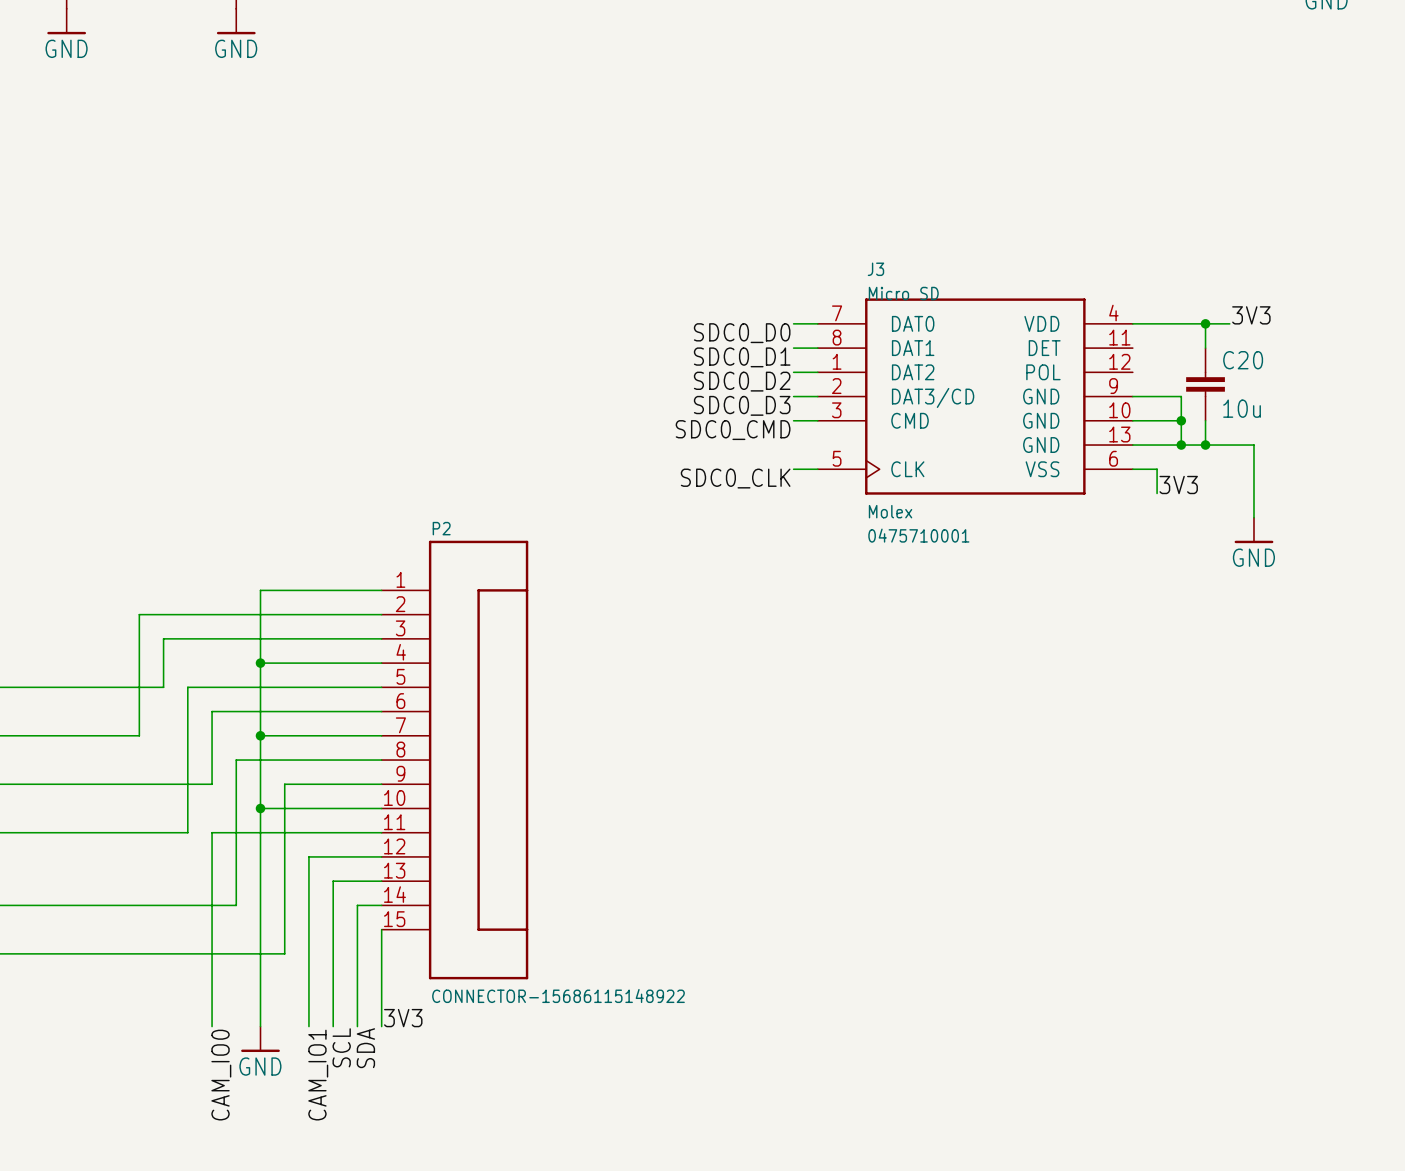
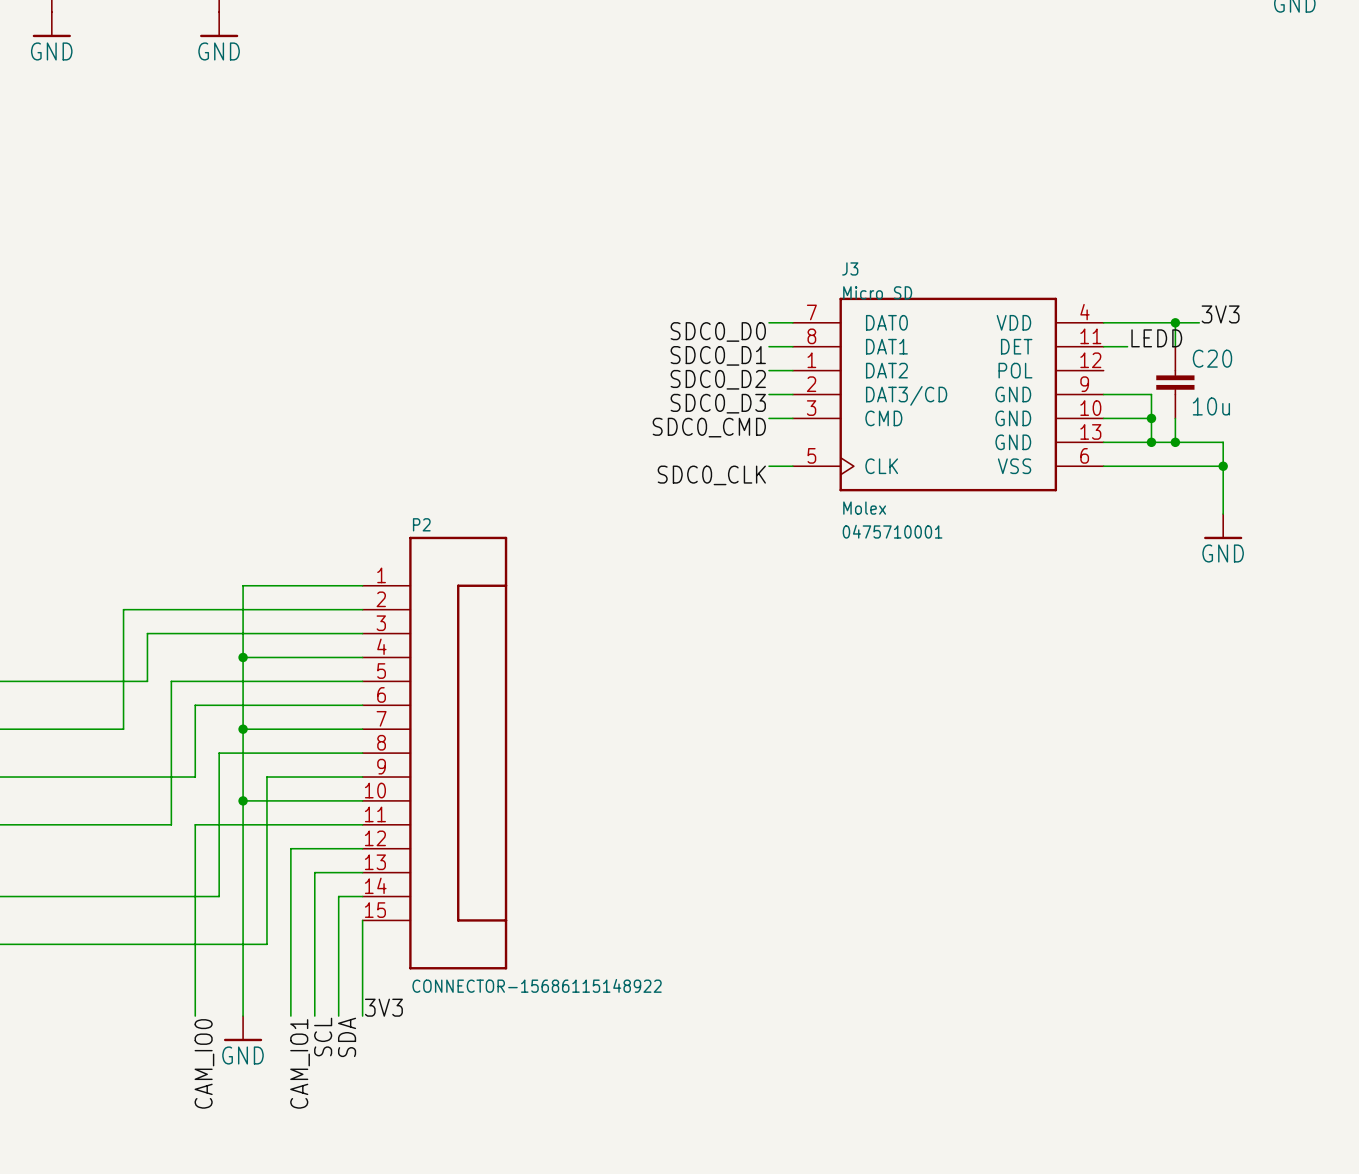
label: none -> LEDD (1156, 338)
wire: none -> (1103, 346) (1127, 346)
wire: (1157, 469) (1157, 493) -> (1127, 466) (1223, 466)
junction: none -> (1223, 466)
label: 3V3 (1178, 485) -> none

